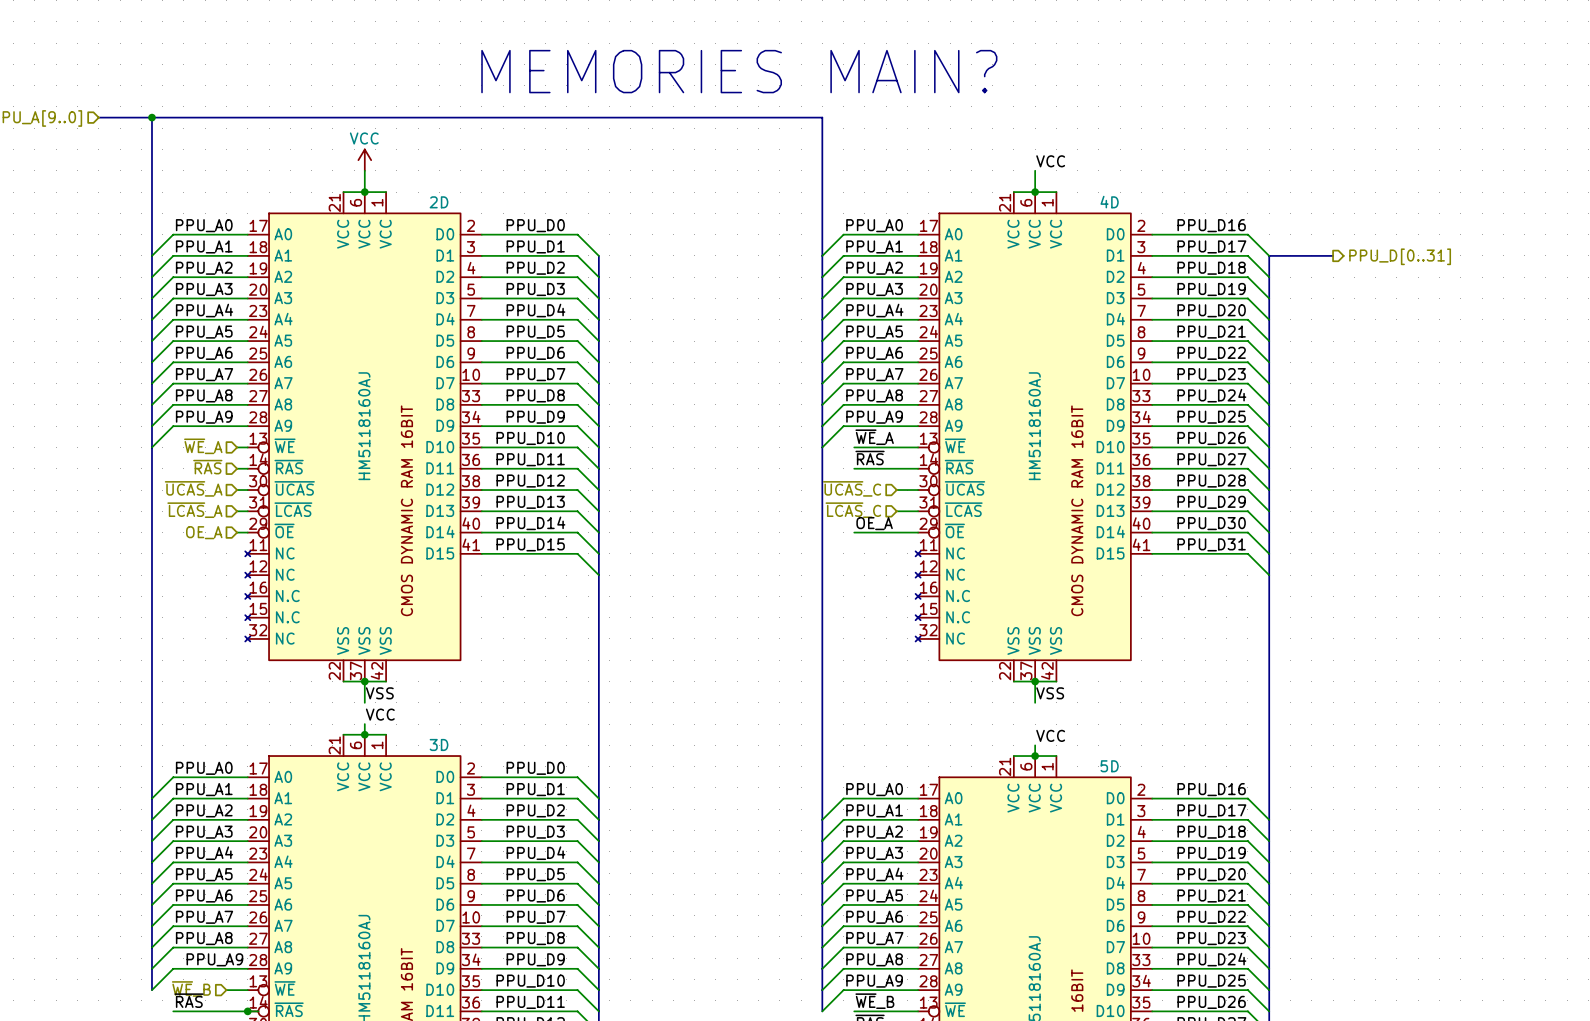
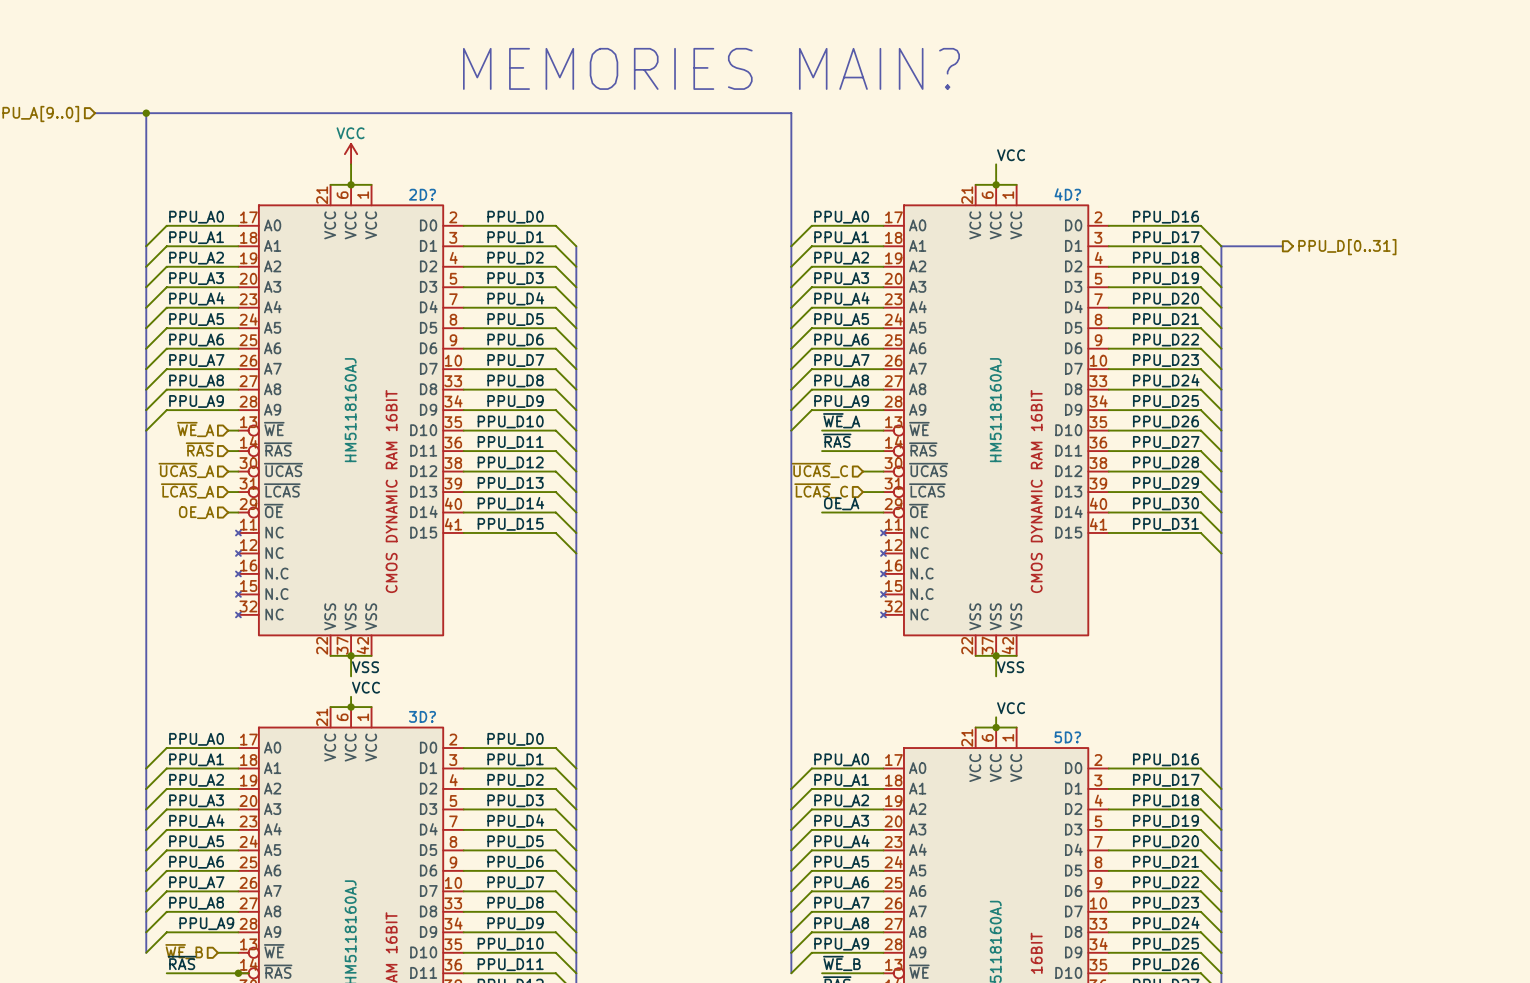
2D name: 2D (439, 202) -> 2D? (422, 194)
4D name: 4D (1109, 202) -> 4D? (1067, 194)
3D name: 3D (439, 744) -> 3D? (422, 716)
5D name: 5D (1109, 766) -> 5D? (1067, 737)

